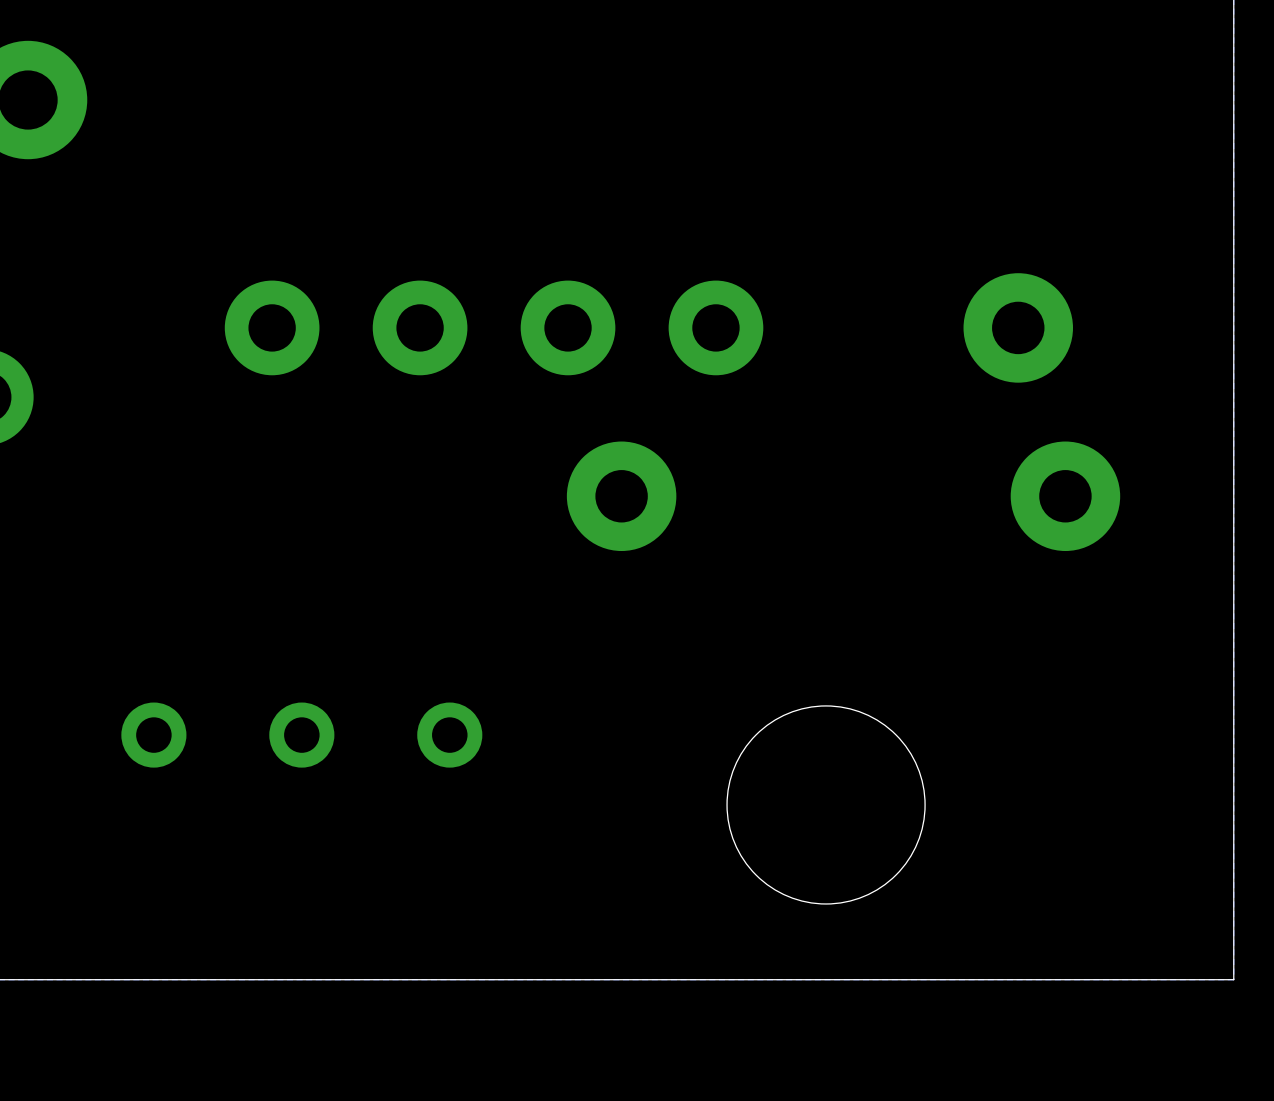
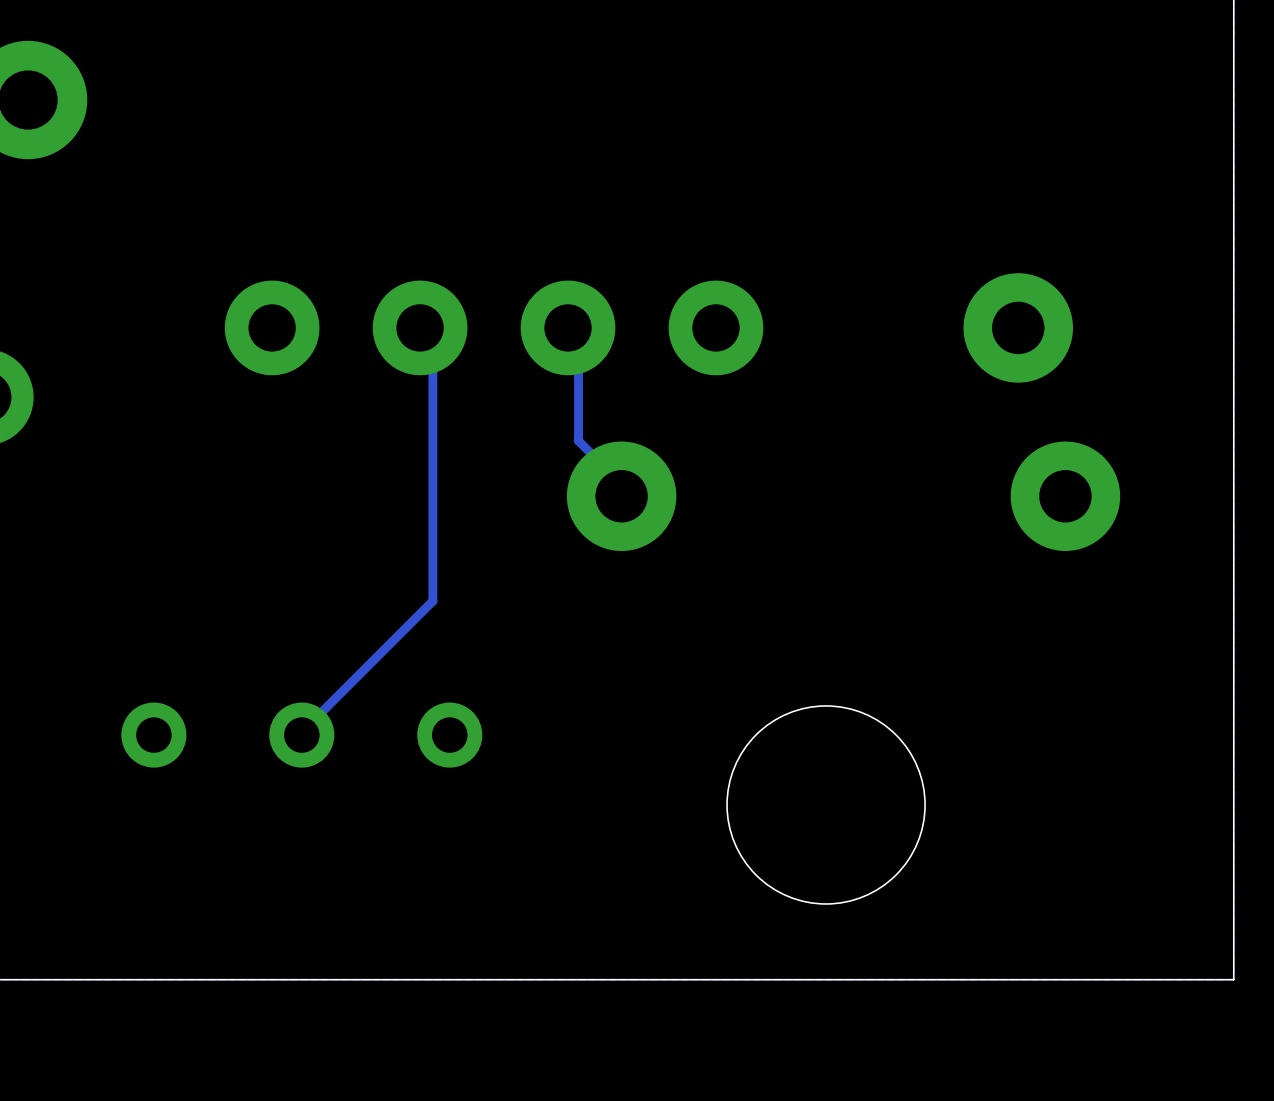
track: none -> (420, 327) (432, 339) (432, 601) (301, 732) (301, 735)
track: none -> (568, 327) (578, 339) (578, 440) (607, 470) (607, 484) (621, 496)

